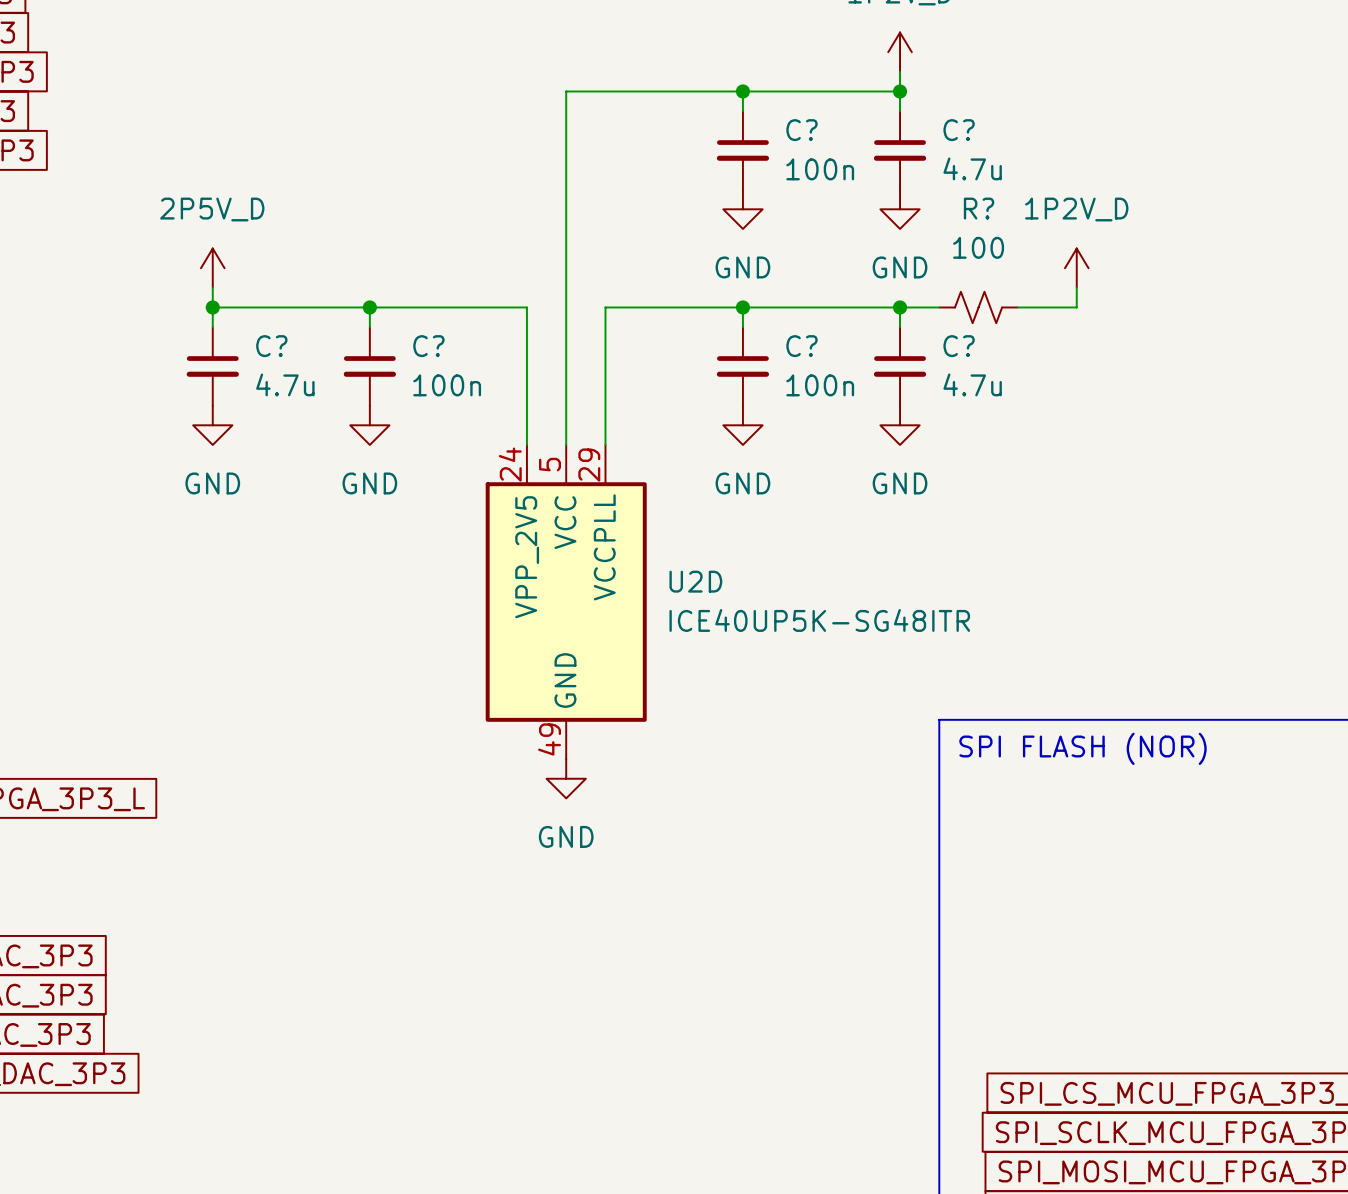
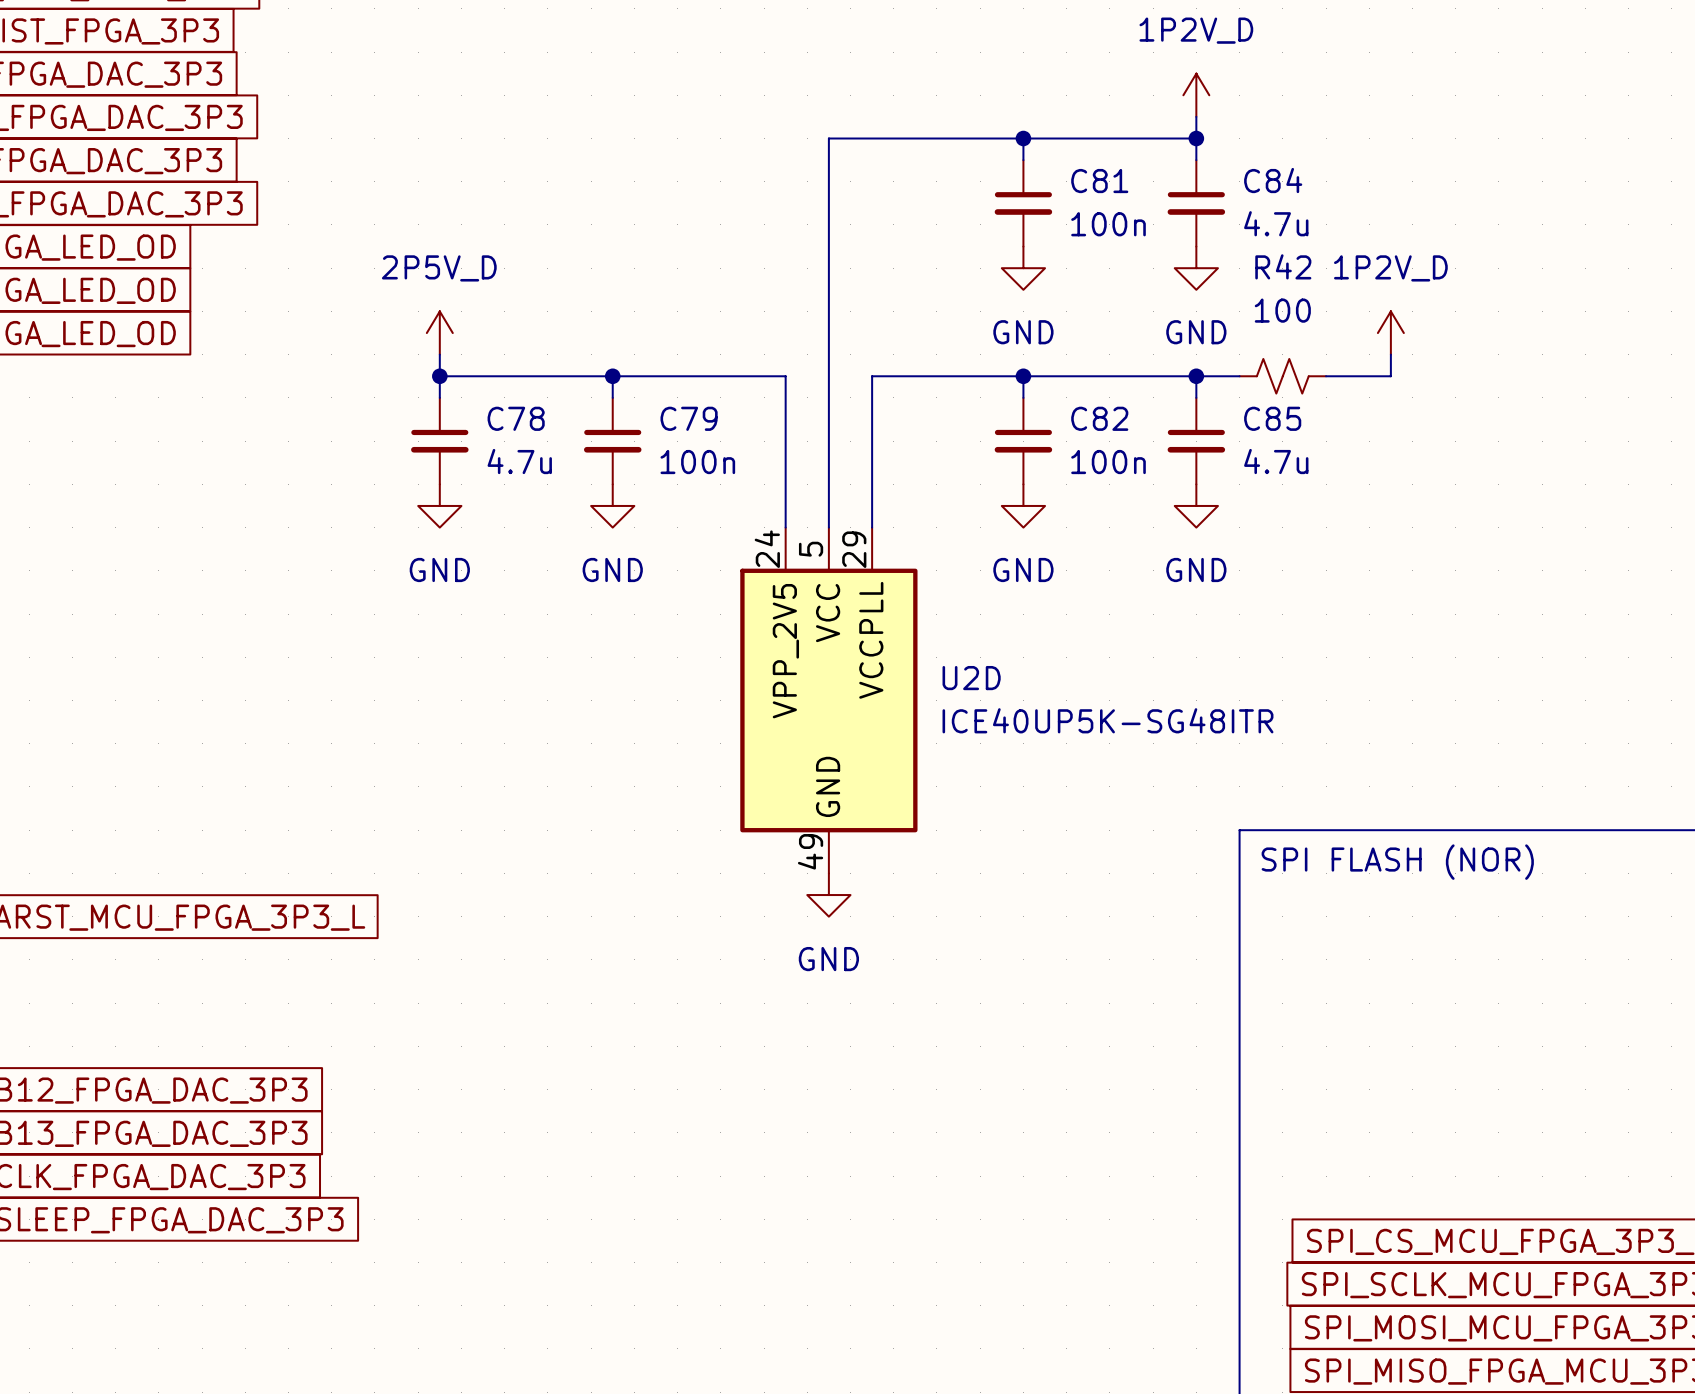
C? name: C? (802, 130) -> C81 (1099, 181)
C? name: C? (959, 130) -> C84 (1273, 180)
R? name: R? (979, 208) -> R42 (1283, 266)
C? name: C? (271, 346) -> C78 (516, 418)
C? name: C? (428, 346) -> C79 (689, 418)
C? name: C? (802, 346) -> C82 (1099, 418)
C? name: C? (959, 346) -> C85 (1272, 418)

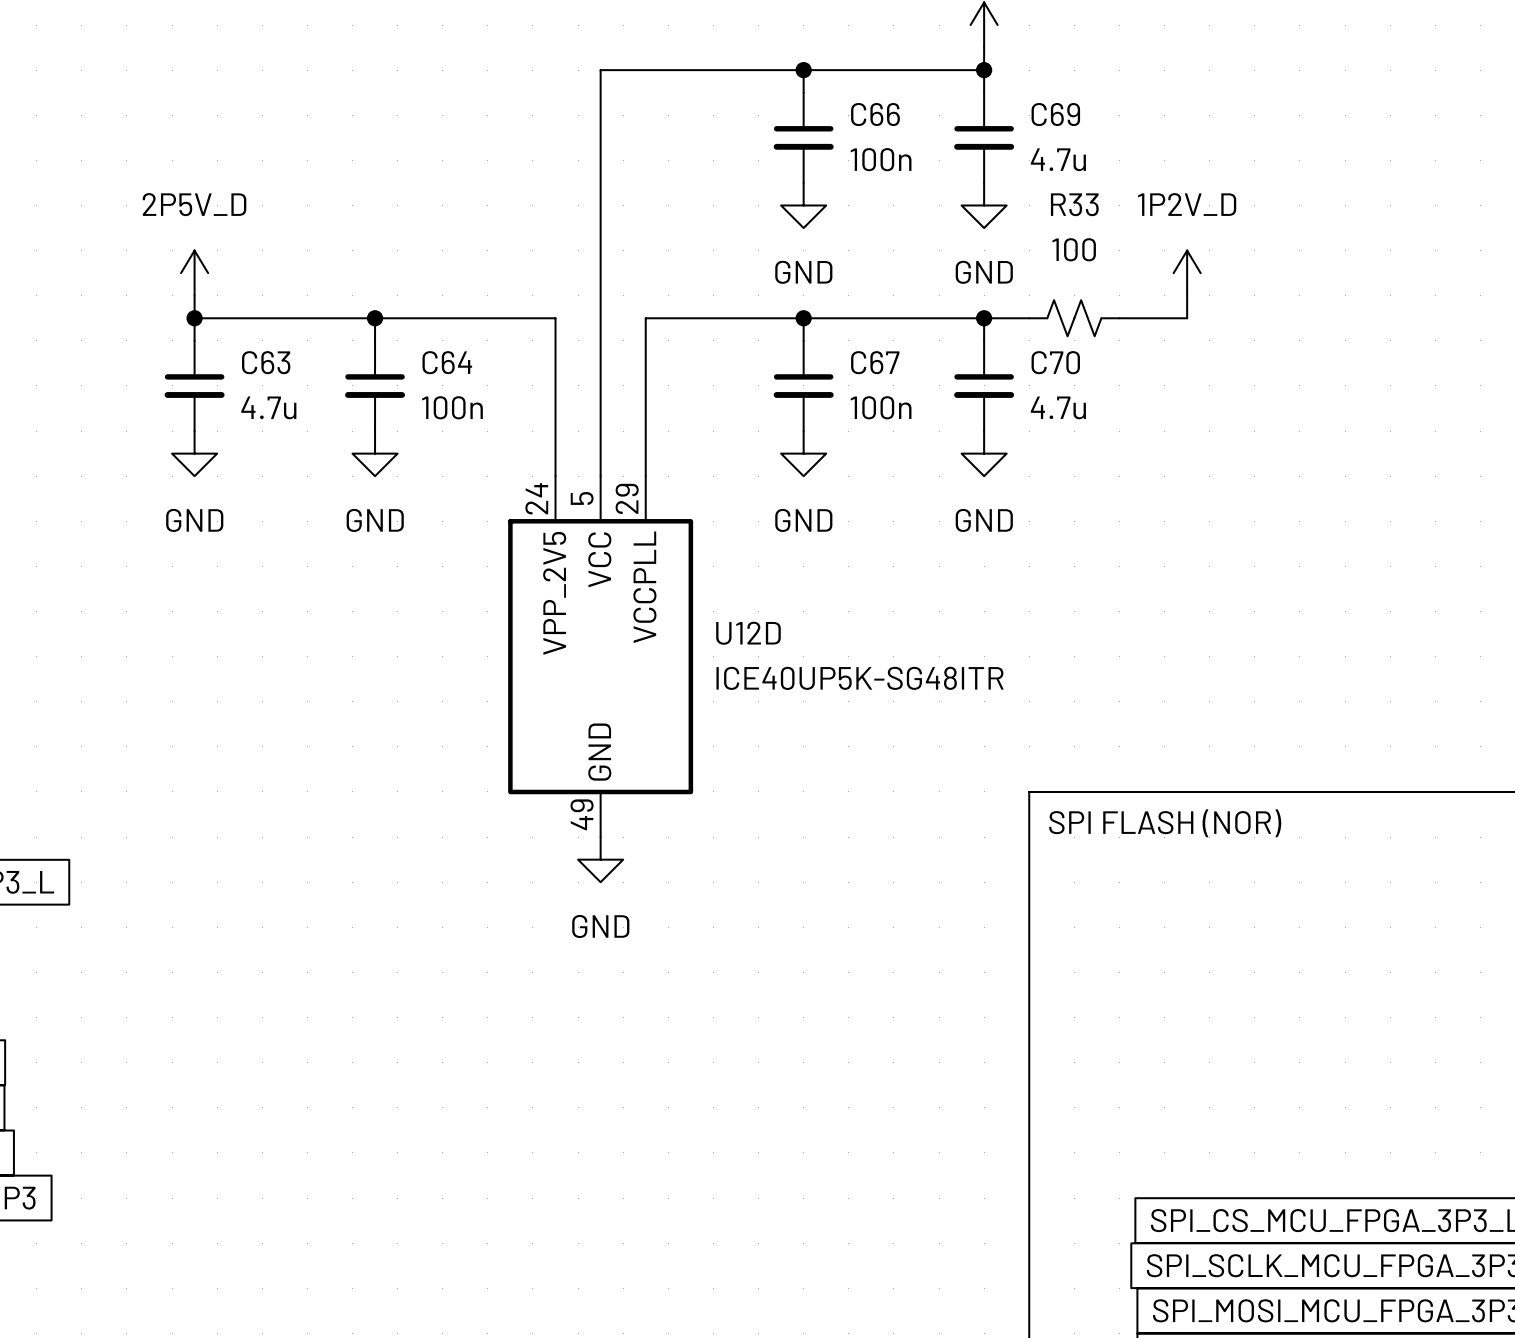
C84 name: C84 (1273, 180) -> C69 (1055, 114)
C81 name: C81 (1099, 181) -> C66 (875, 114)
R42 name: R42 (1283, 266) -> R33 (1074, 204)
C78 name: C78 (516, 418) -> C63 (266, 362)
C79 name: C79 (689, 418) -> C64 (447, 362)
C82 name: C82 (1099, 418) -> C67 (875, 362)
C85 name: C85 (1272, 418) -> C70 (1055, 362)
U2D name: U2D (971, 678) -> U12D (748, 633)

